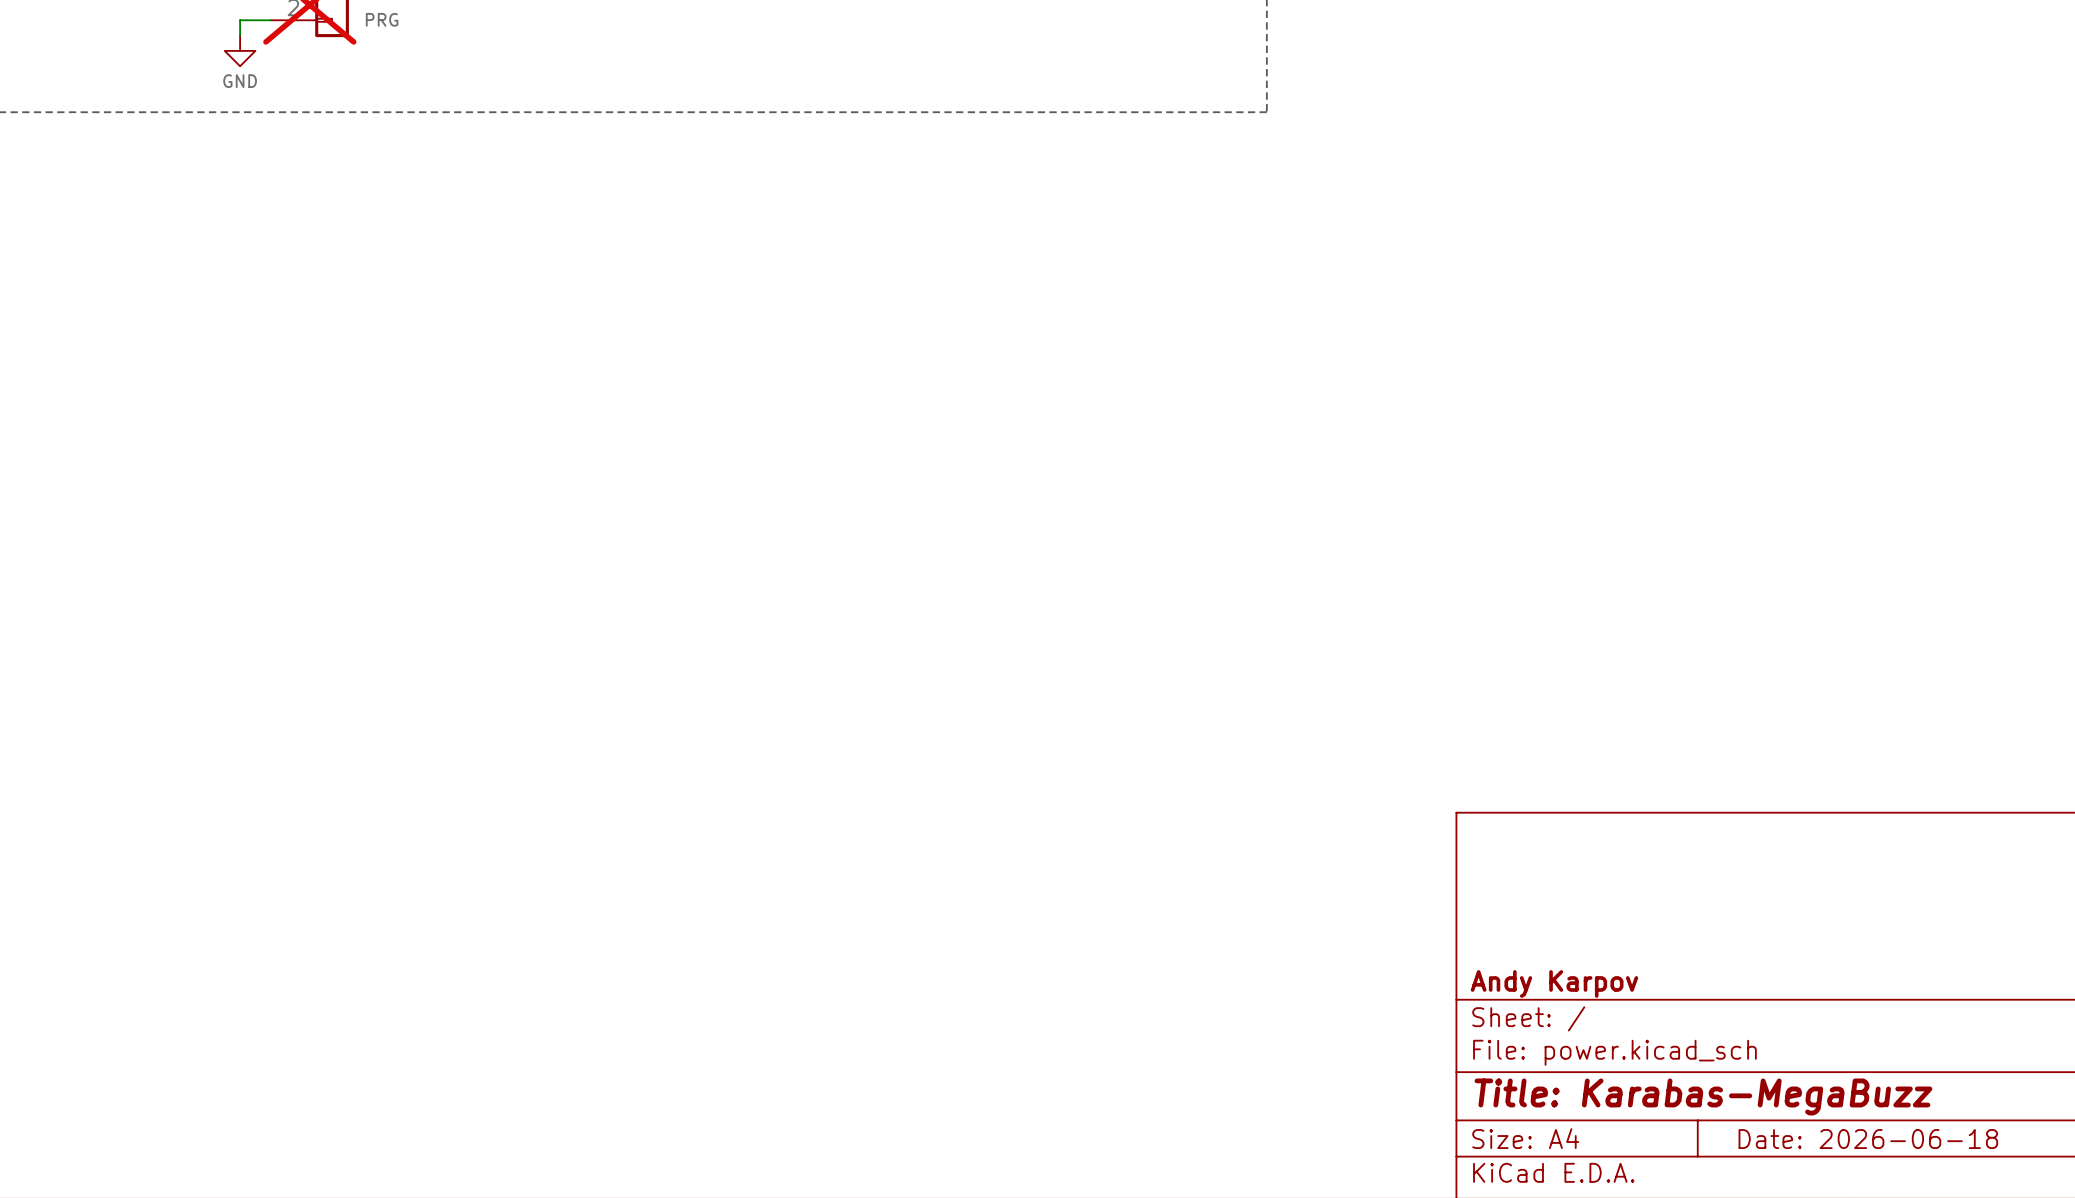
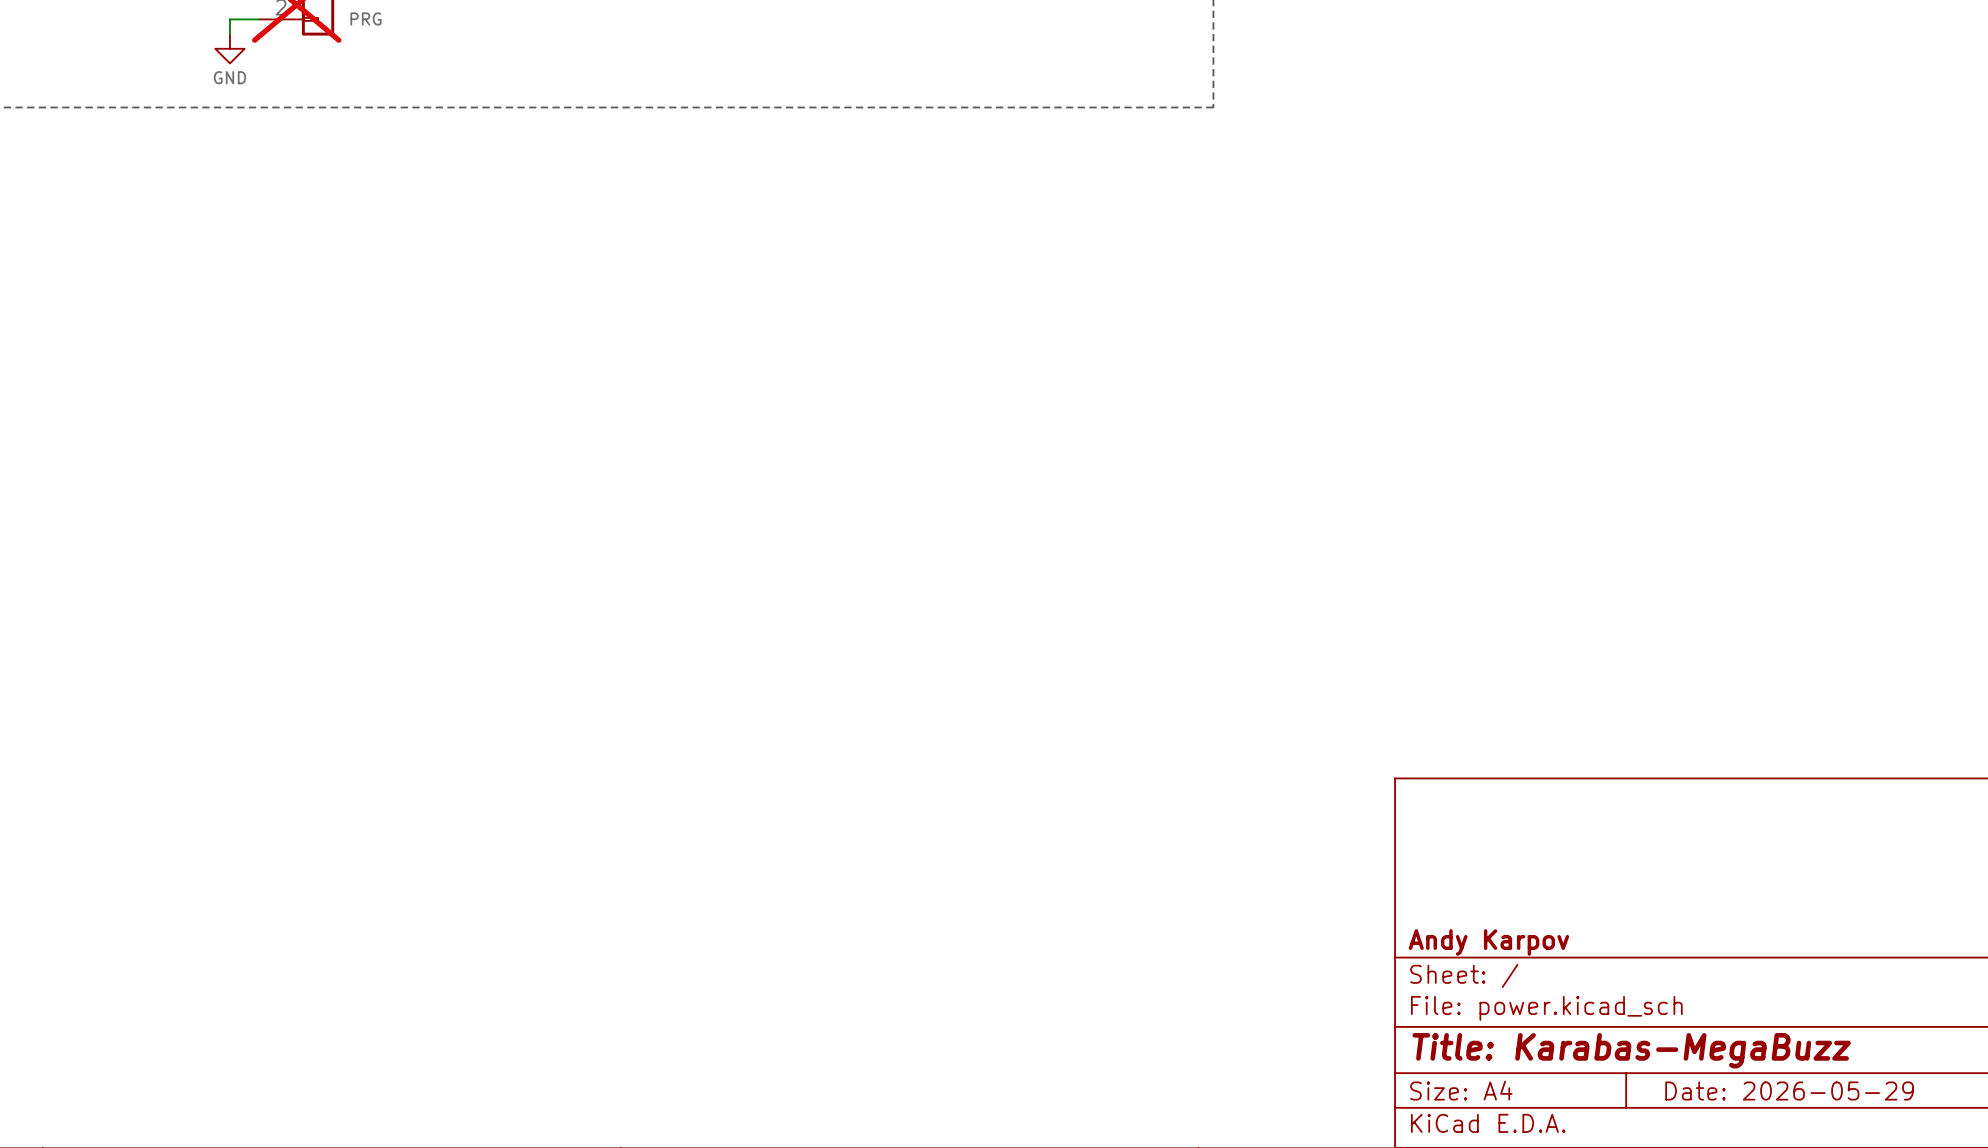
title block: Date: 2026-06-18 (1868, 1139) -> Date: 2026-05-29 (1789, 1091)

